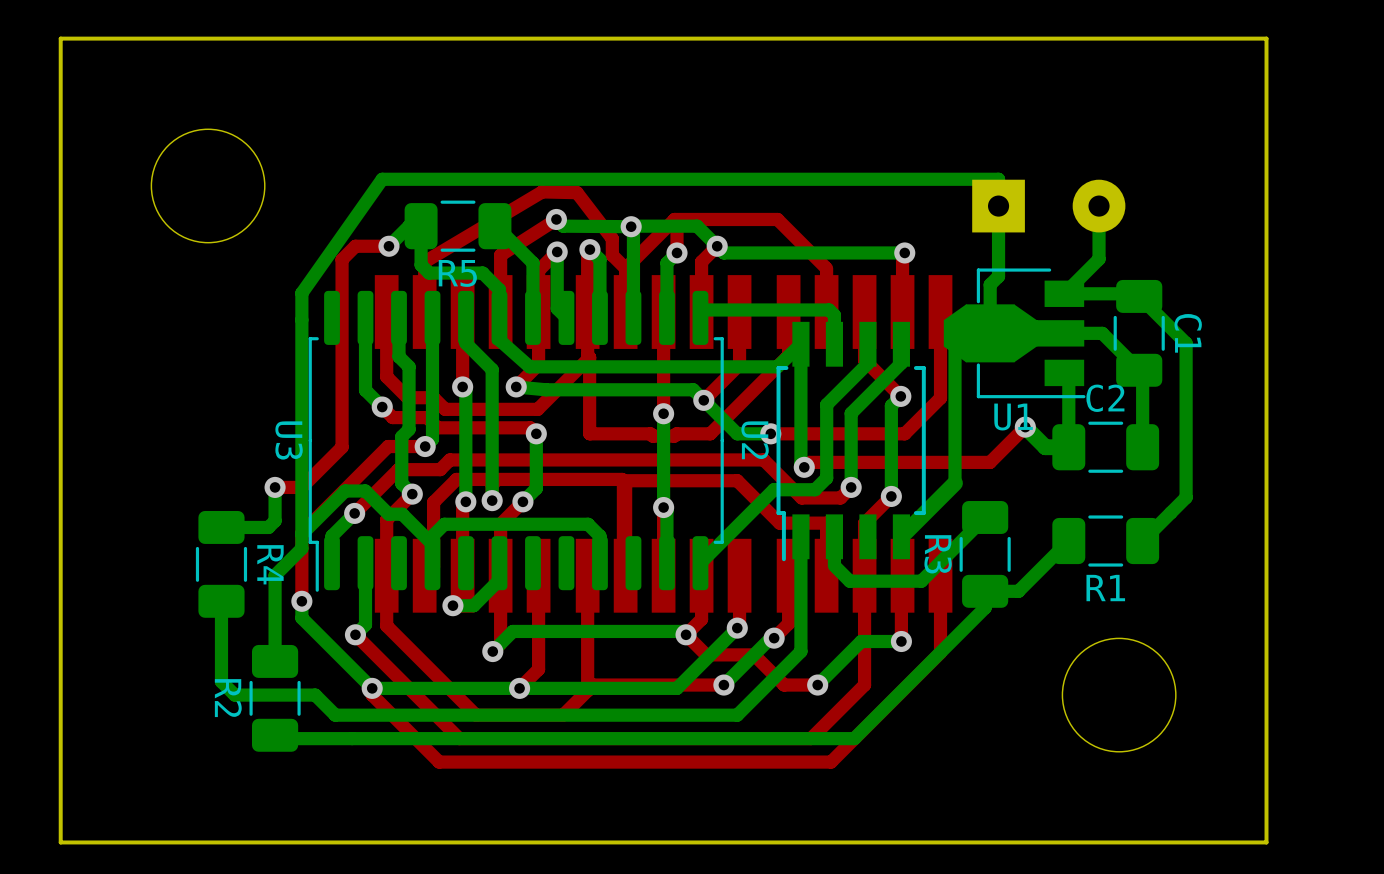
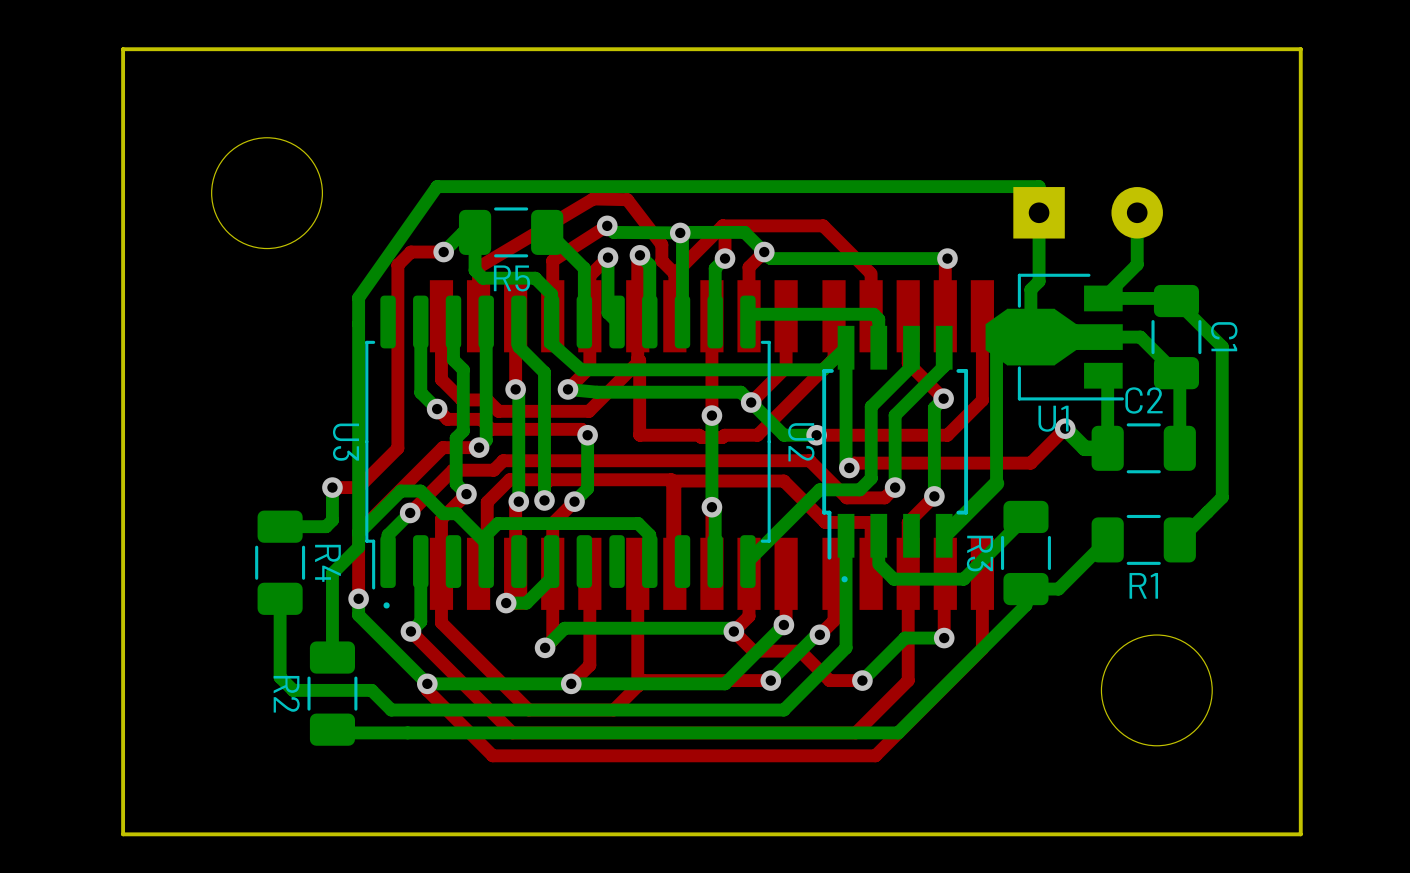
text: none -> . (844, 579)
text: none -> . (386, 605)

